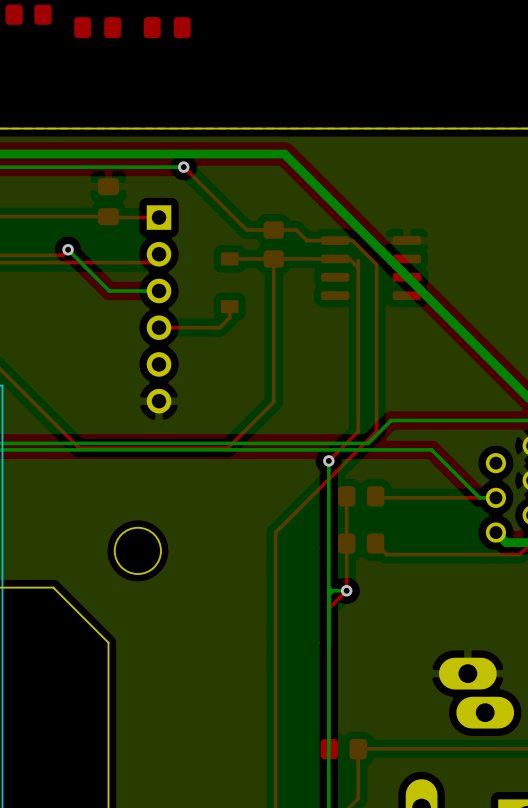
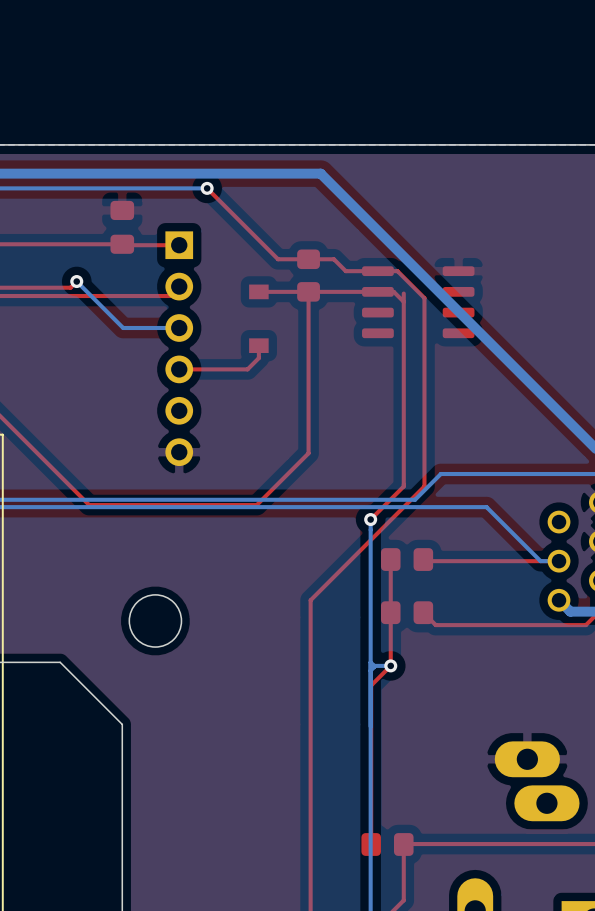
part: (28, 14) -> none
part: (97, 27) -> none
part: (167, 27) -> none

